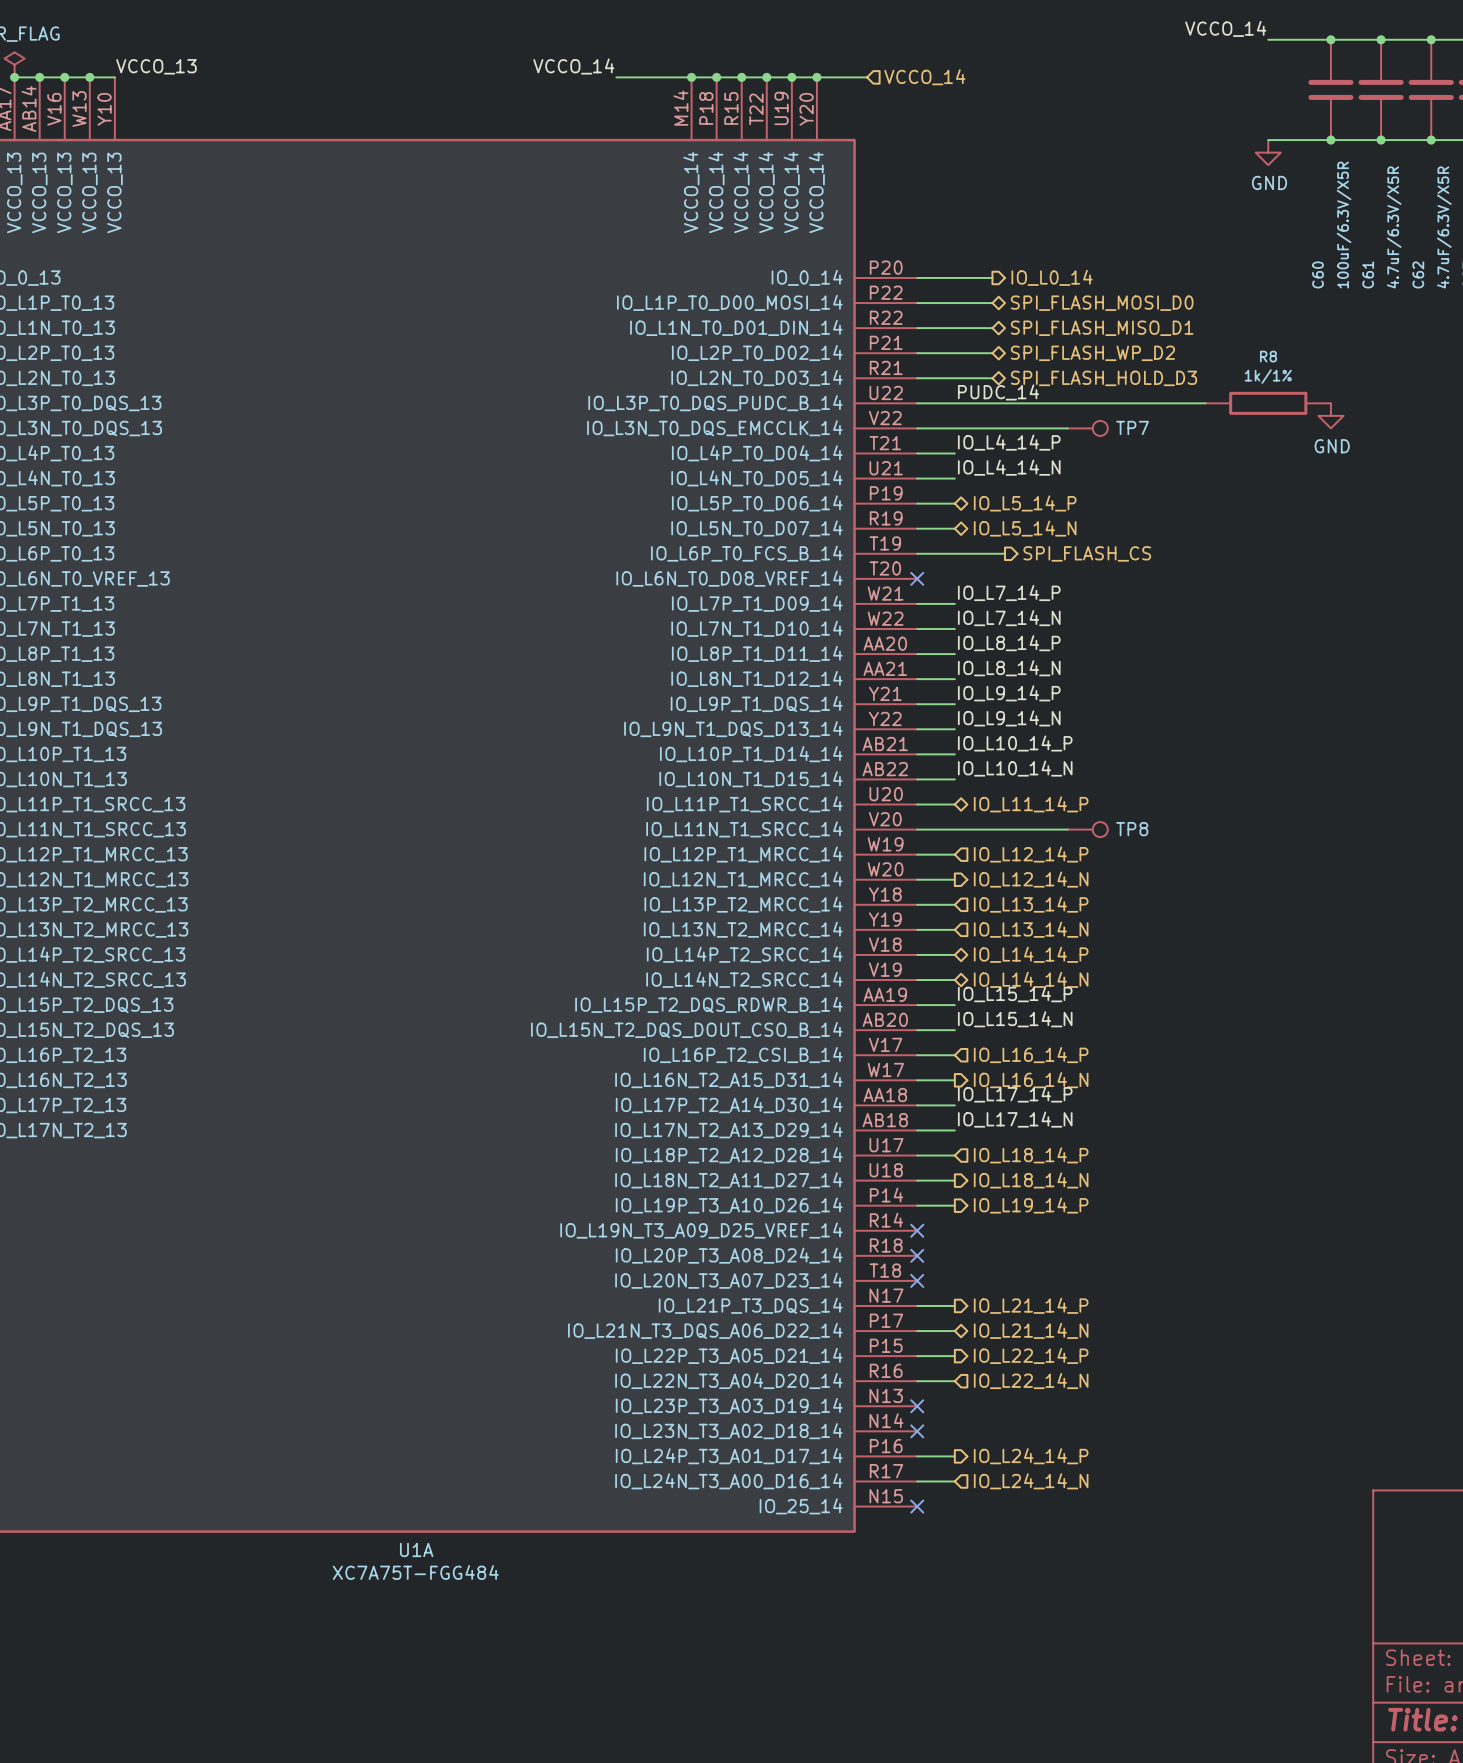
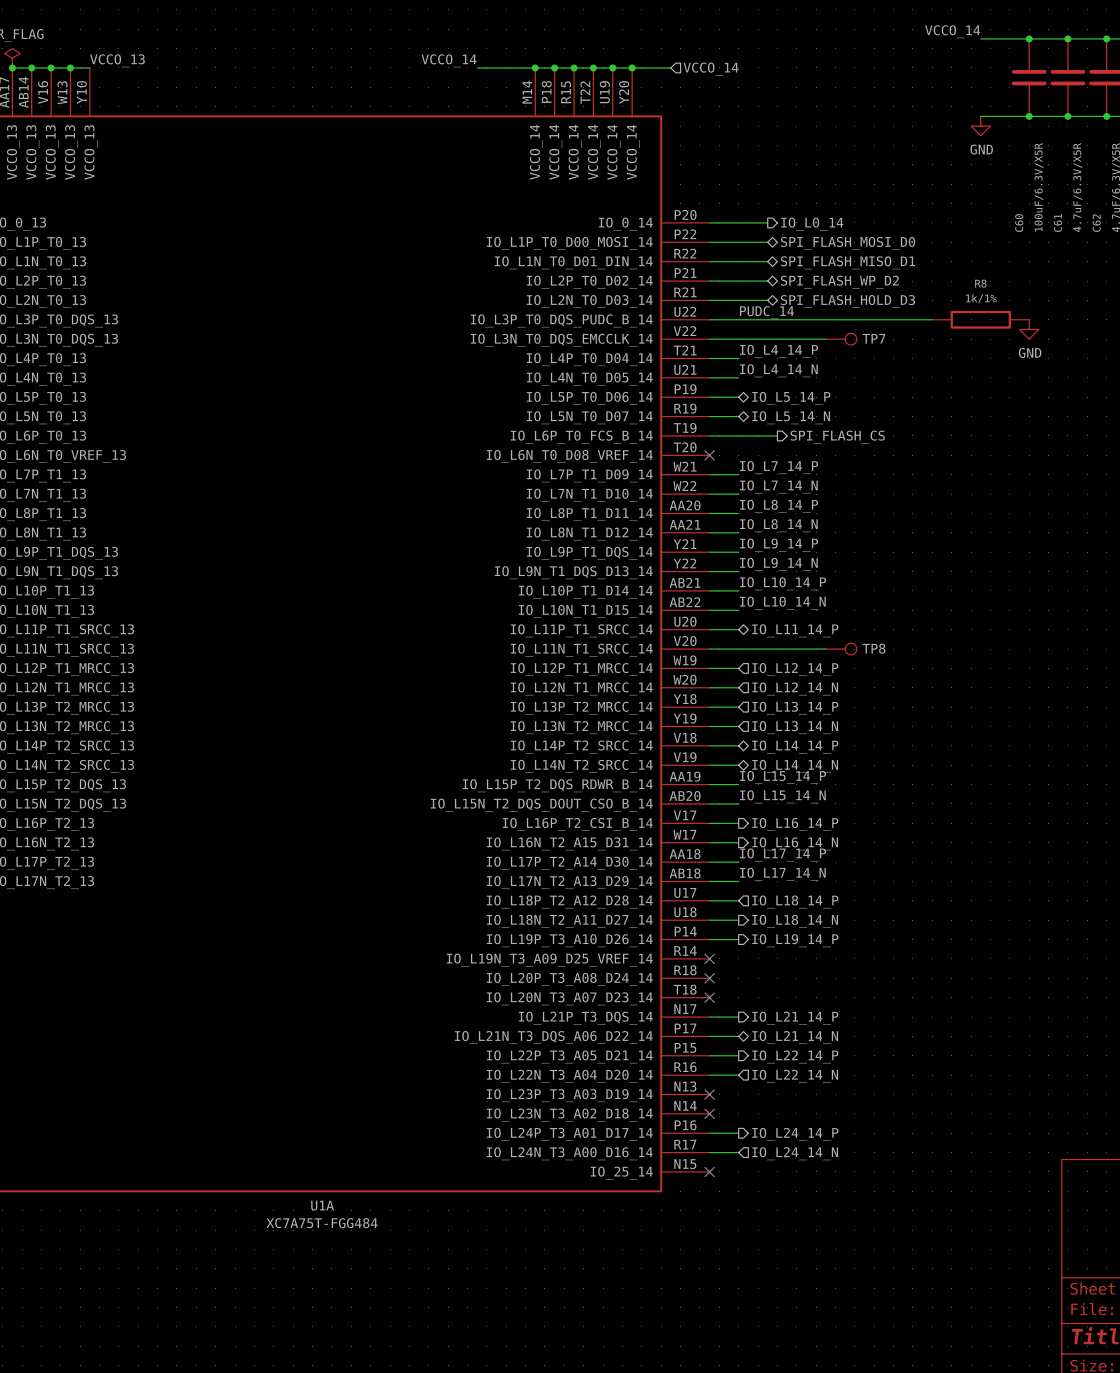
hierarchical label shape: output (1031, 879) -> input (795, 688)
hierarchical label shape: input (1031, 1055) -> output (795, 824)

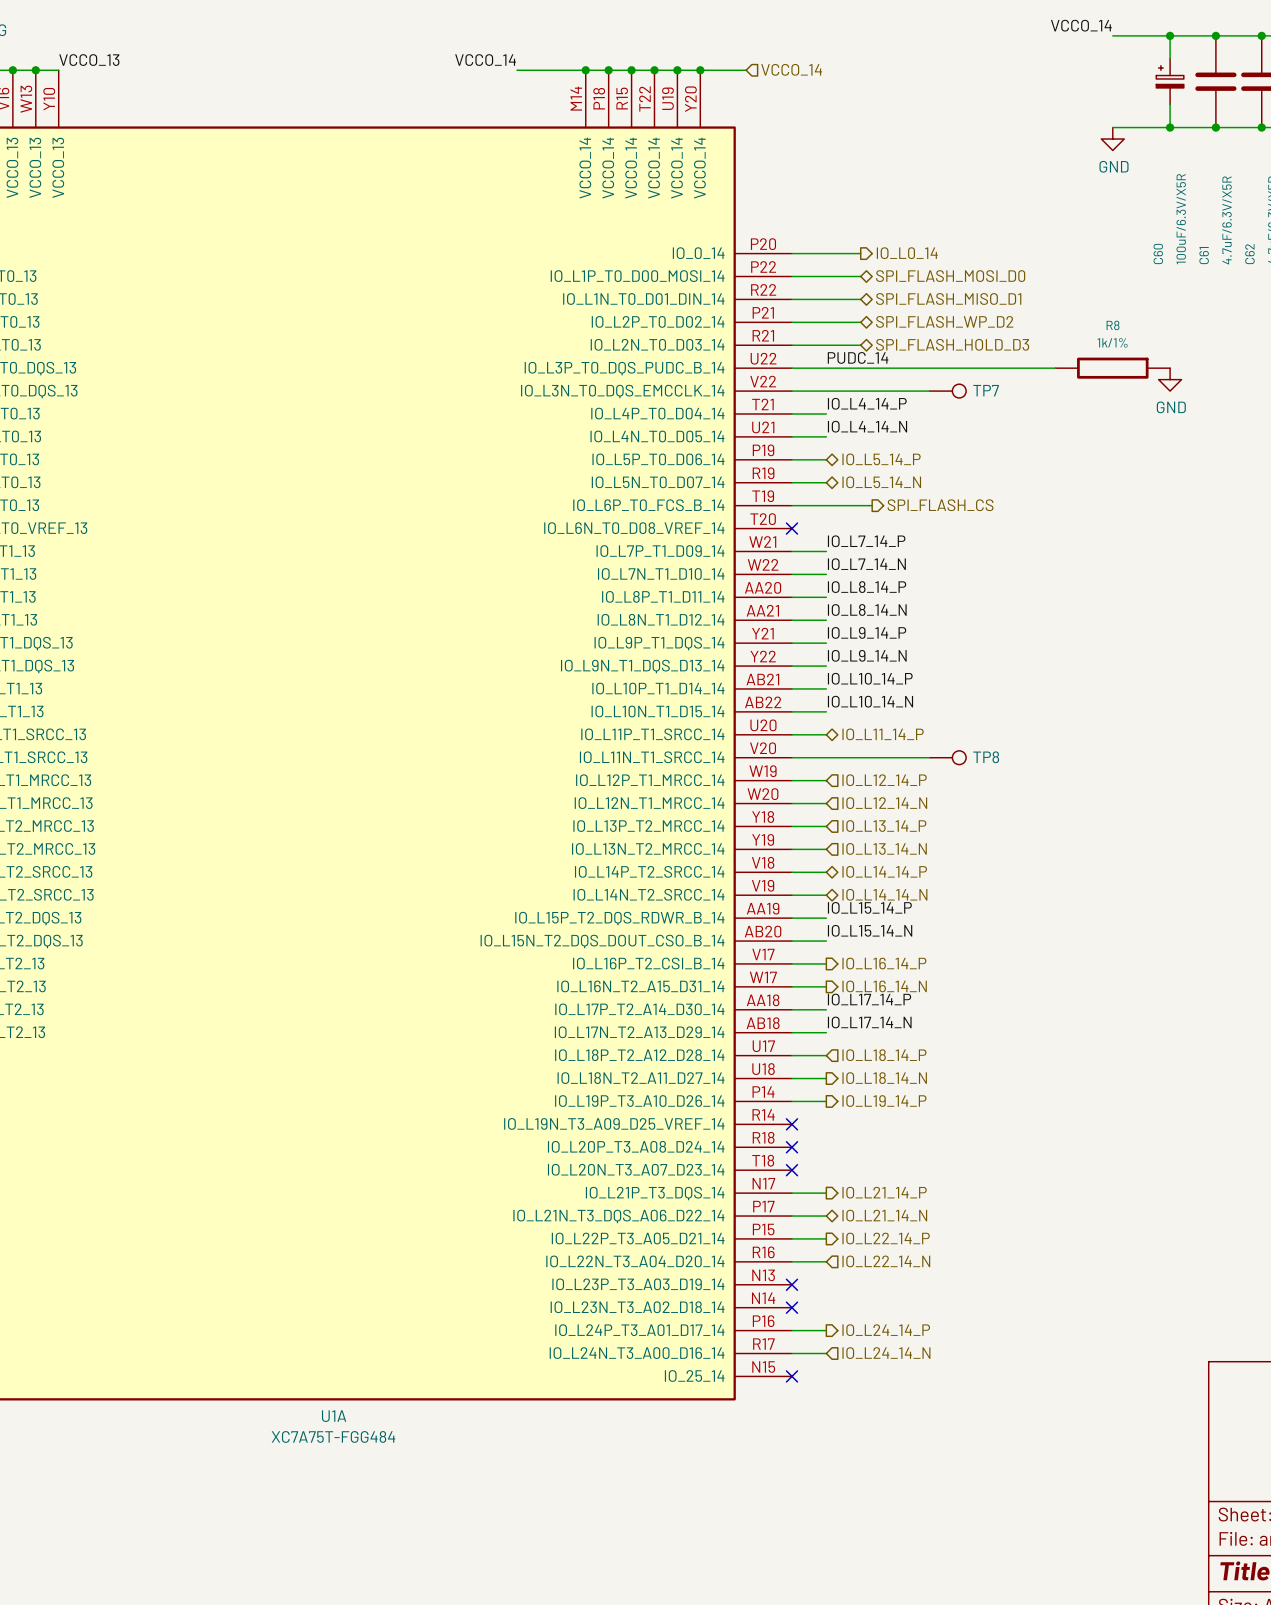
C60 symbol: [1011, 38, 1047, 117] -> [1156, 58, 1184, 105]

